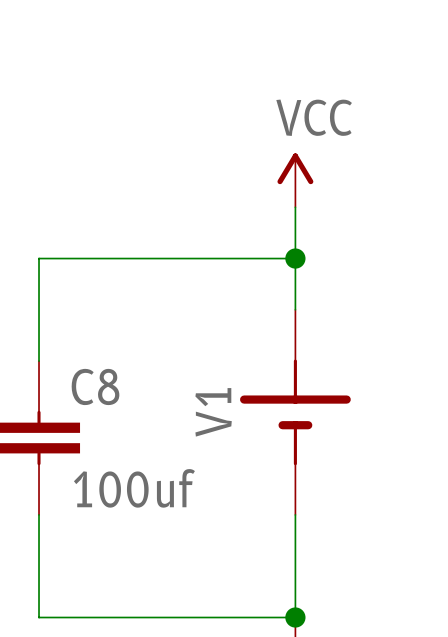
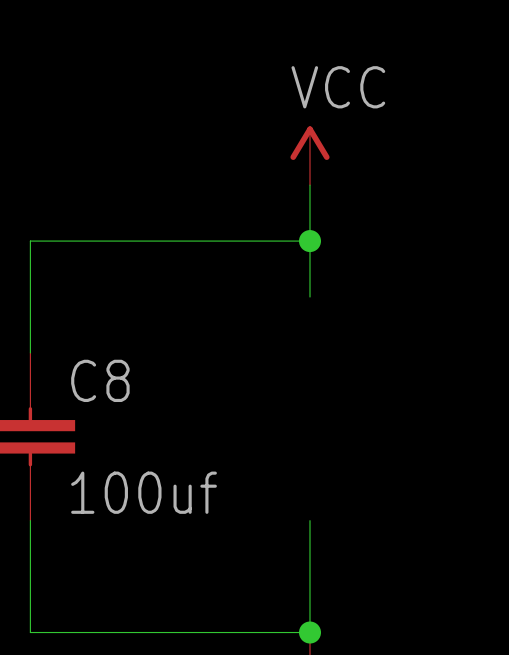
V1: (295, 412) -> none

